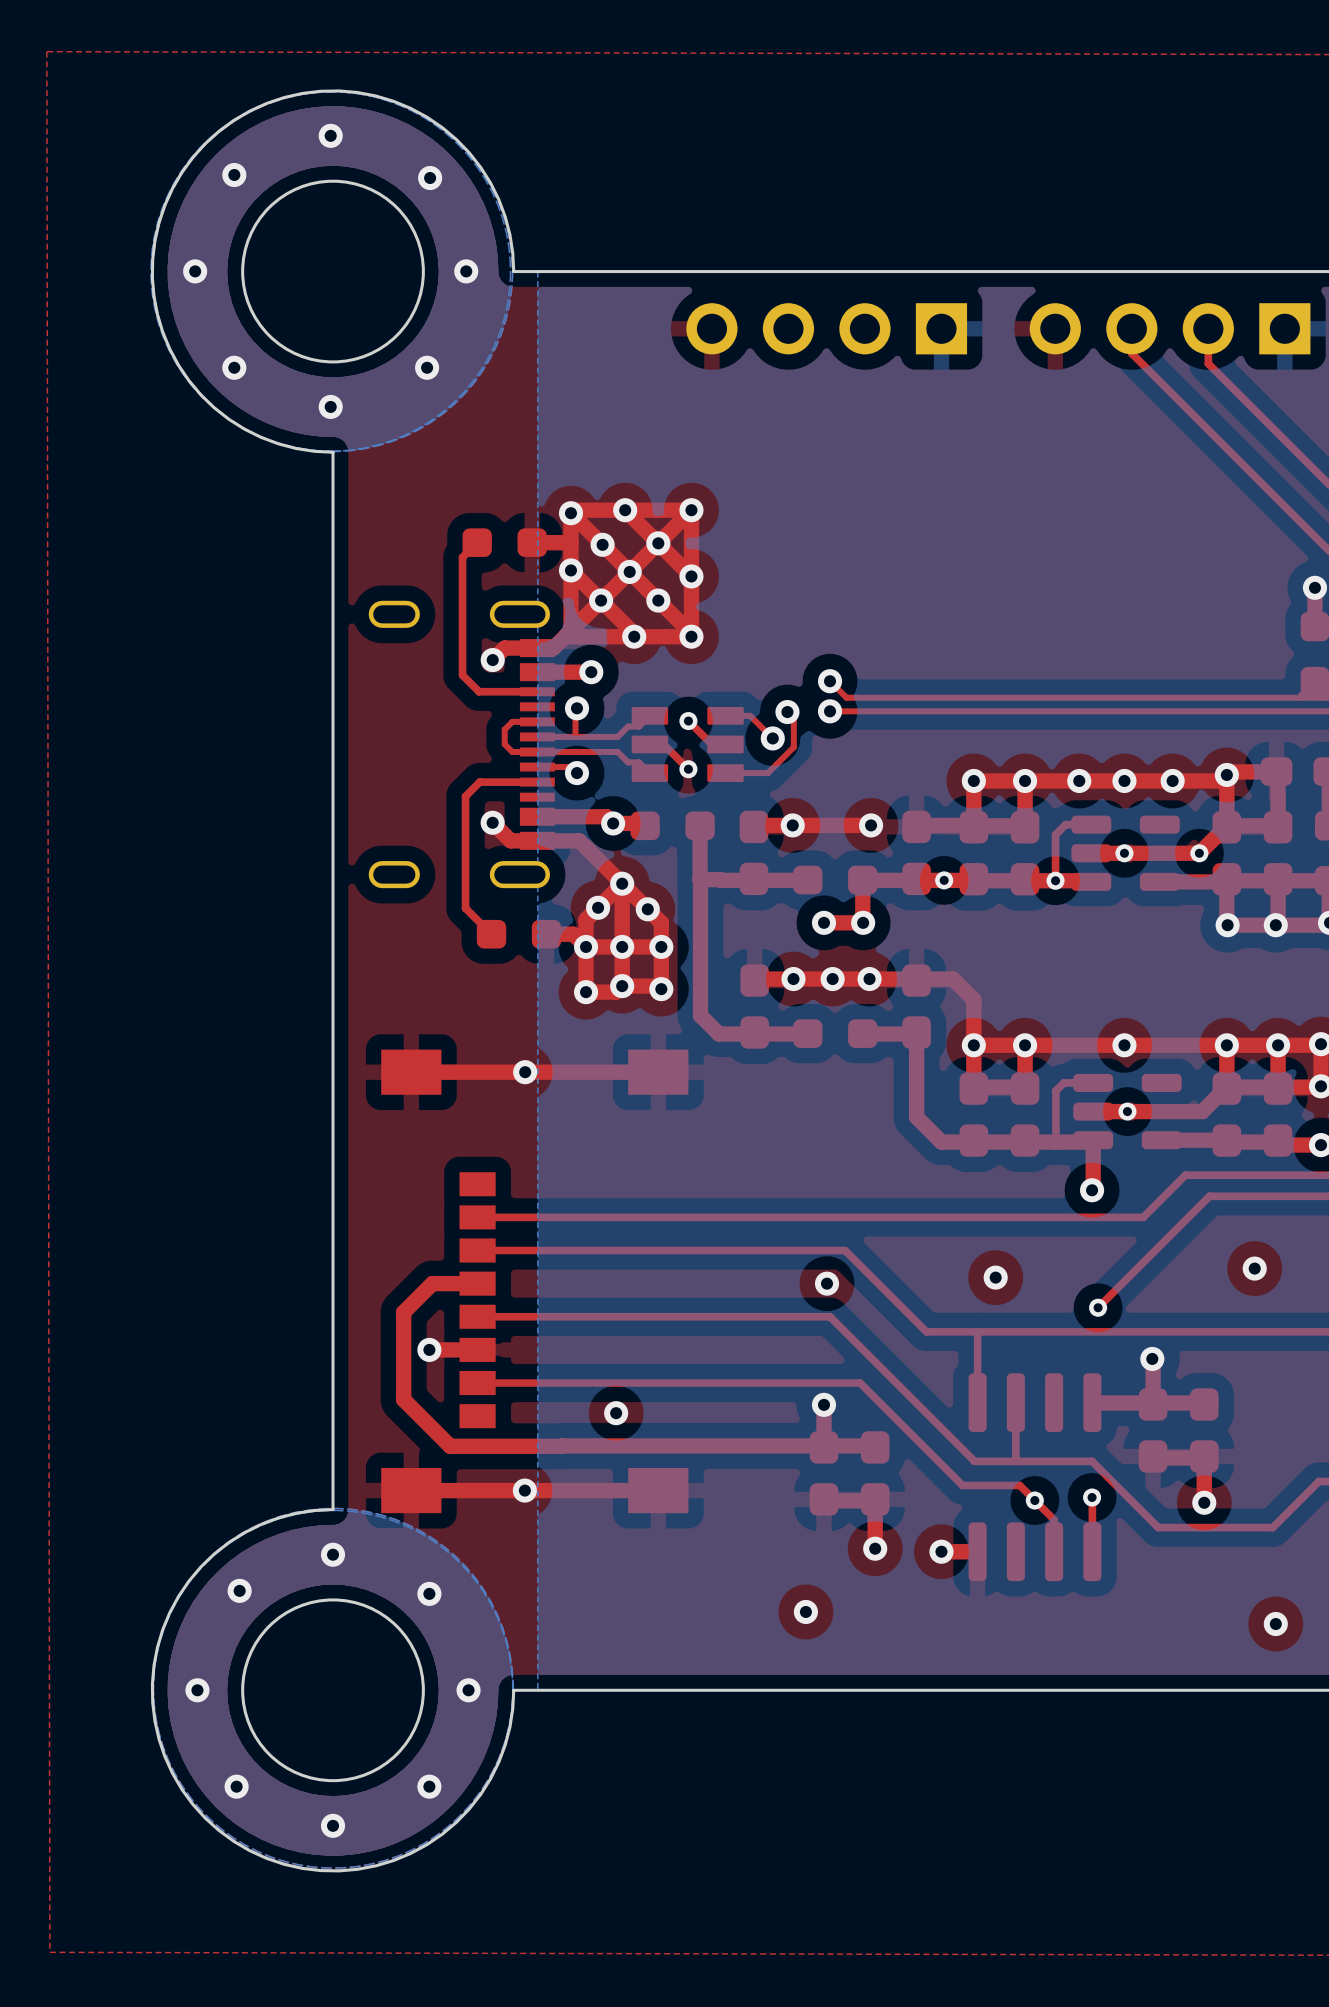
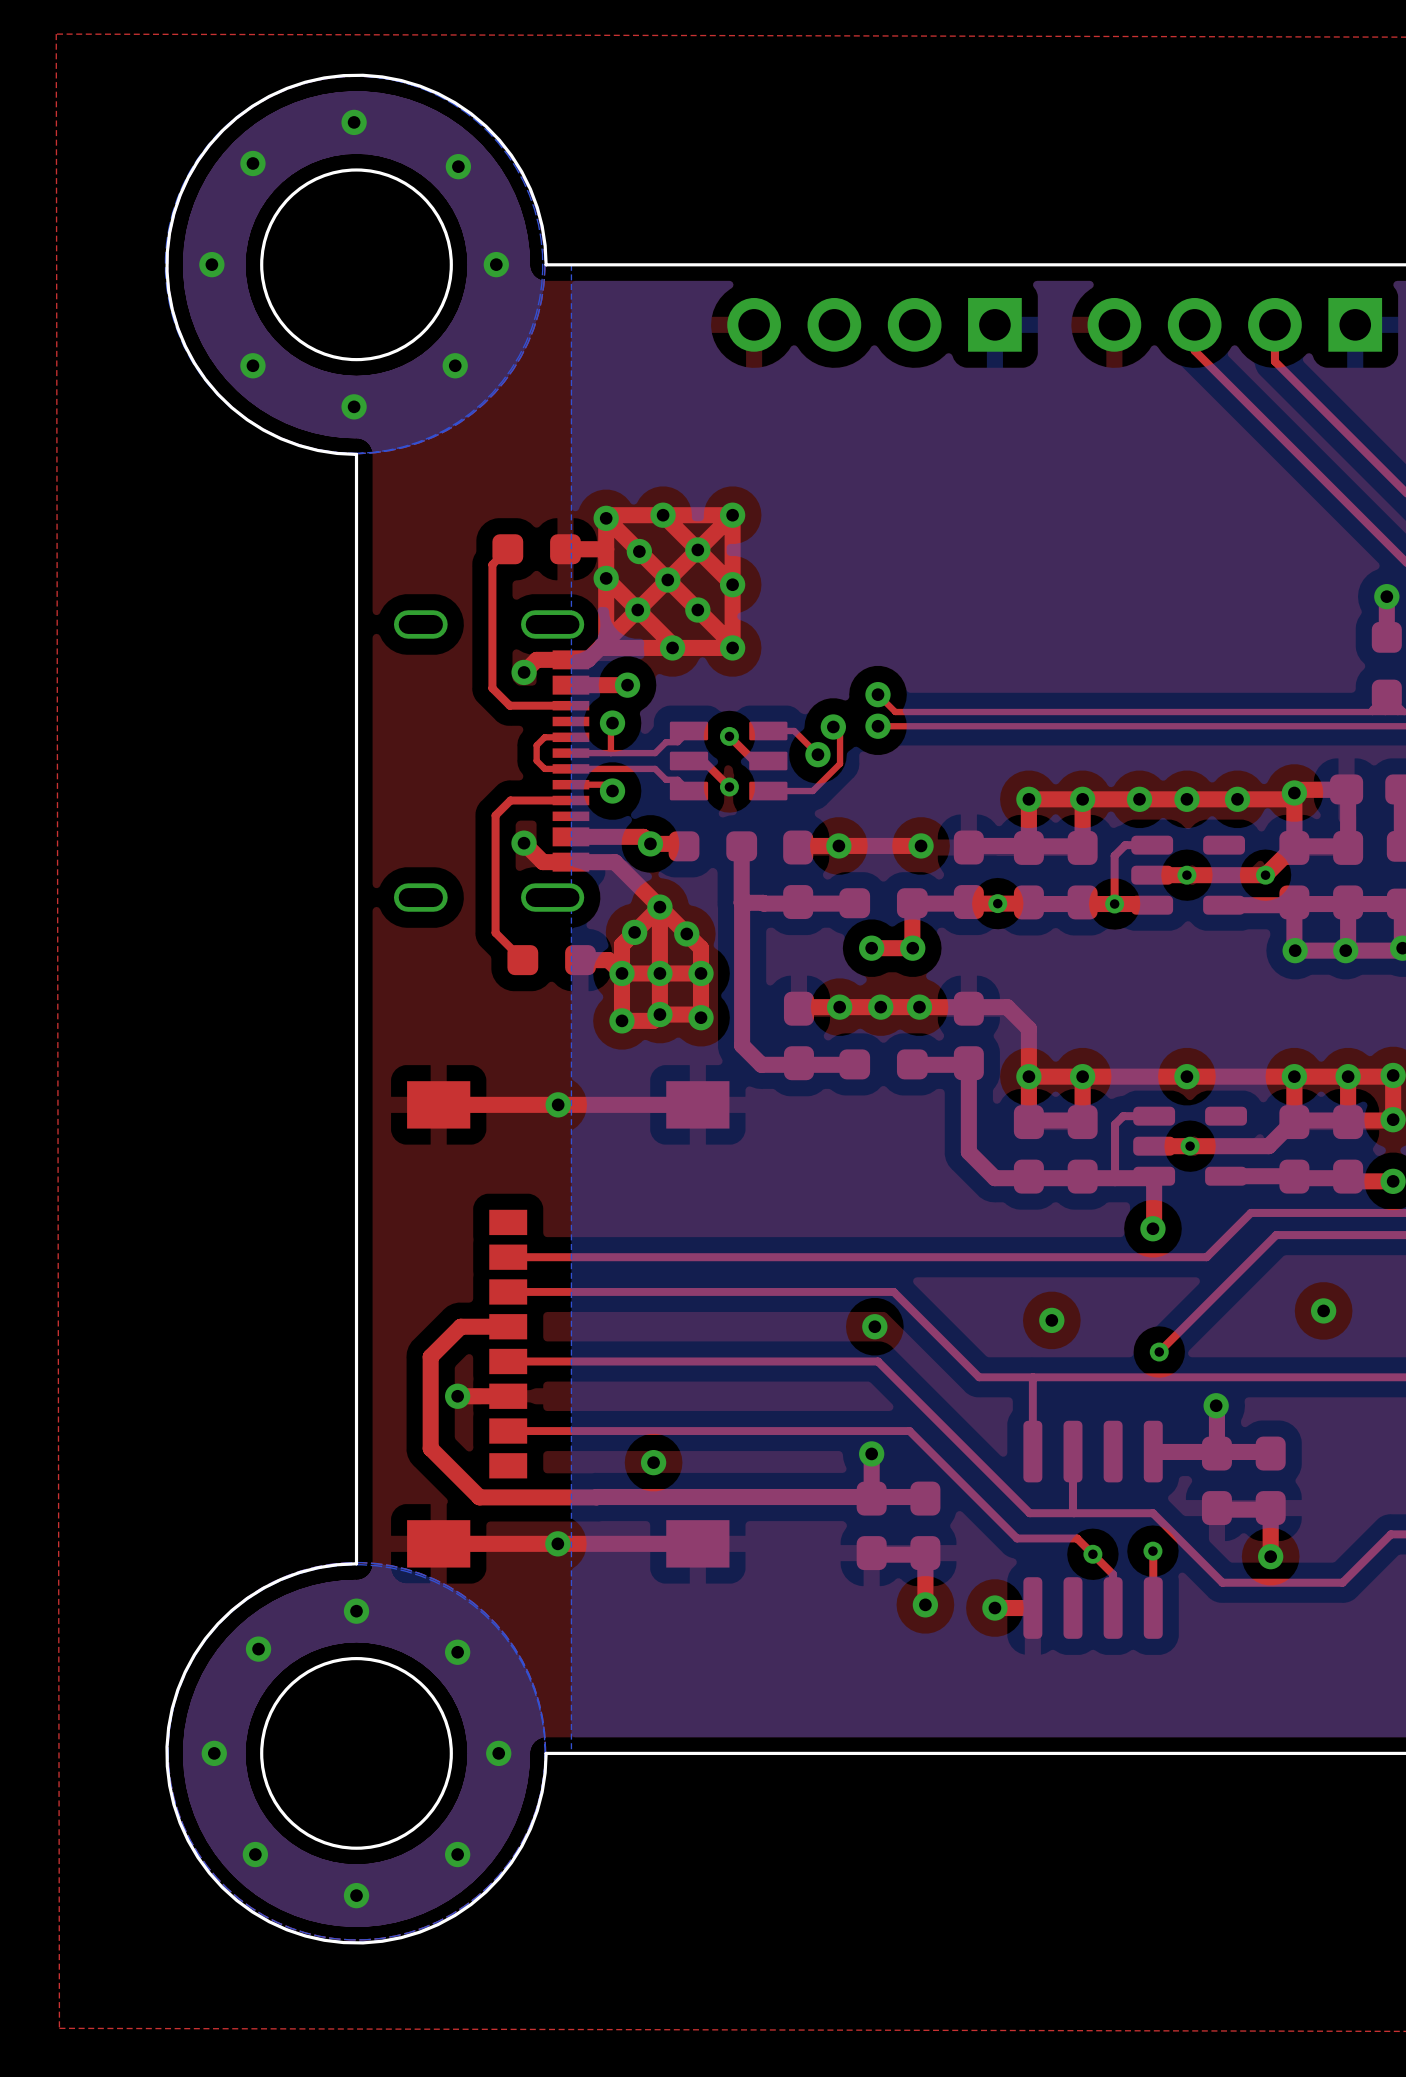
via: (805, 1611) -> none
via: (1275, 1624) -> none

